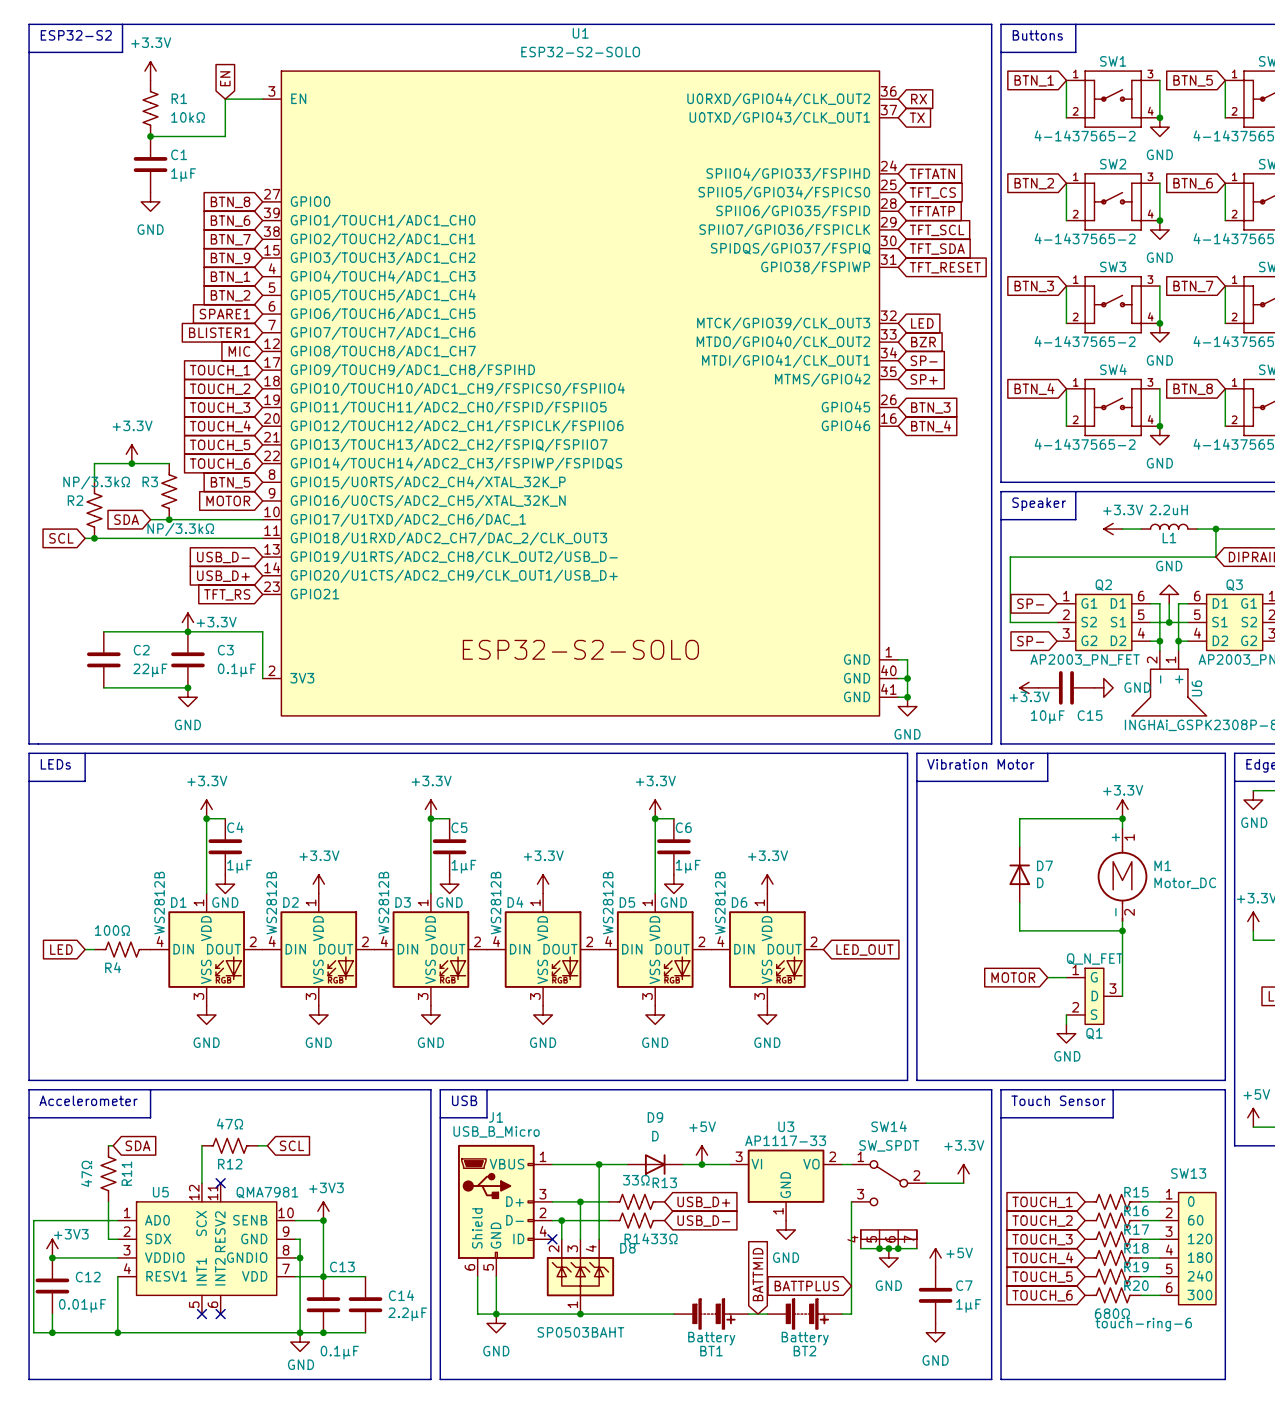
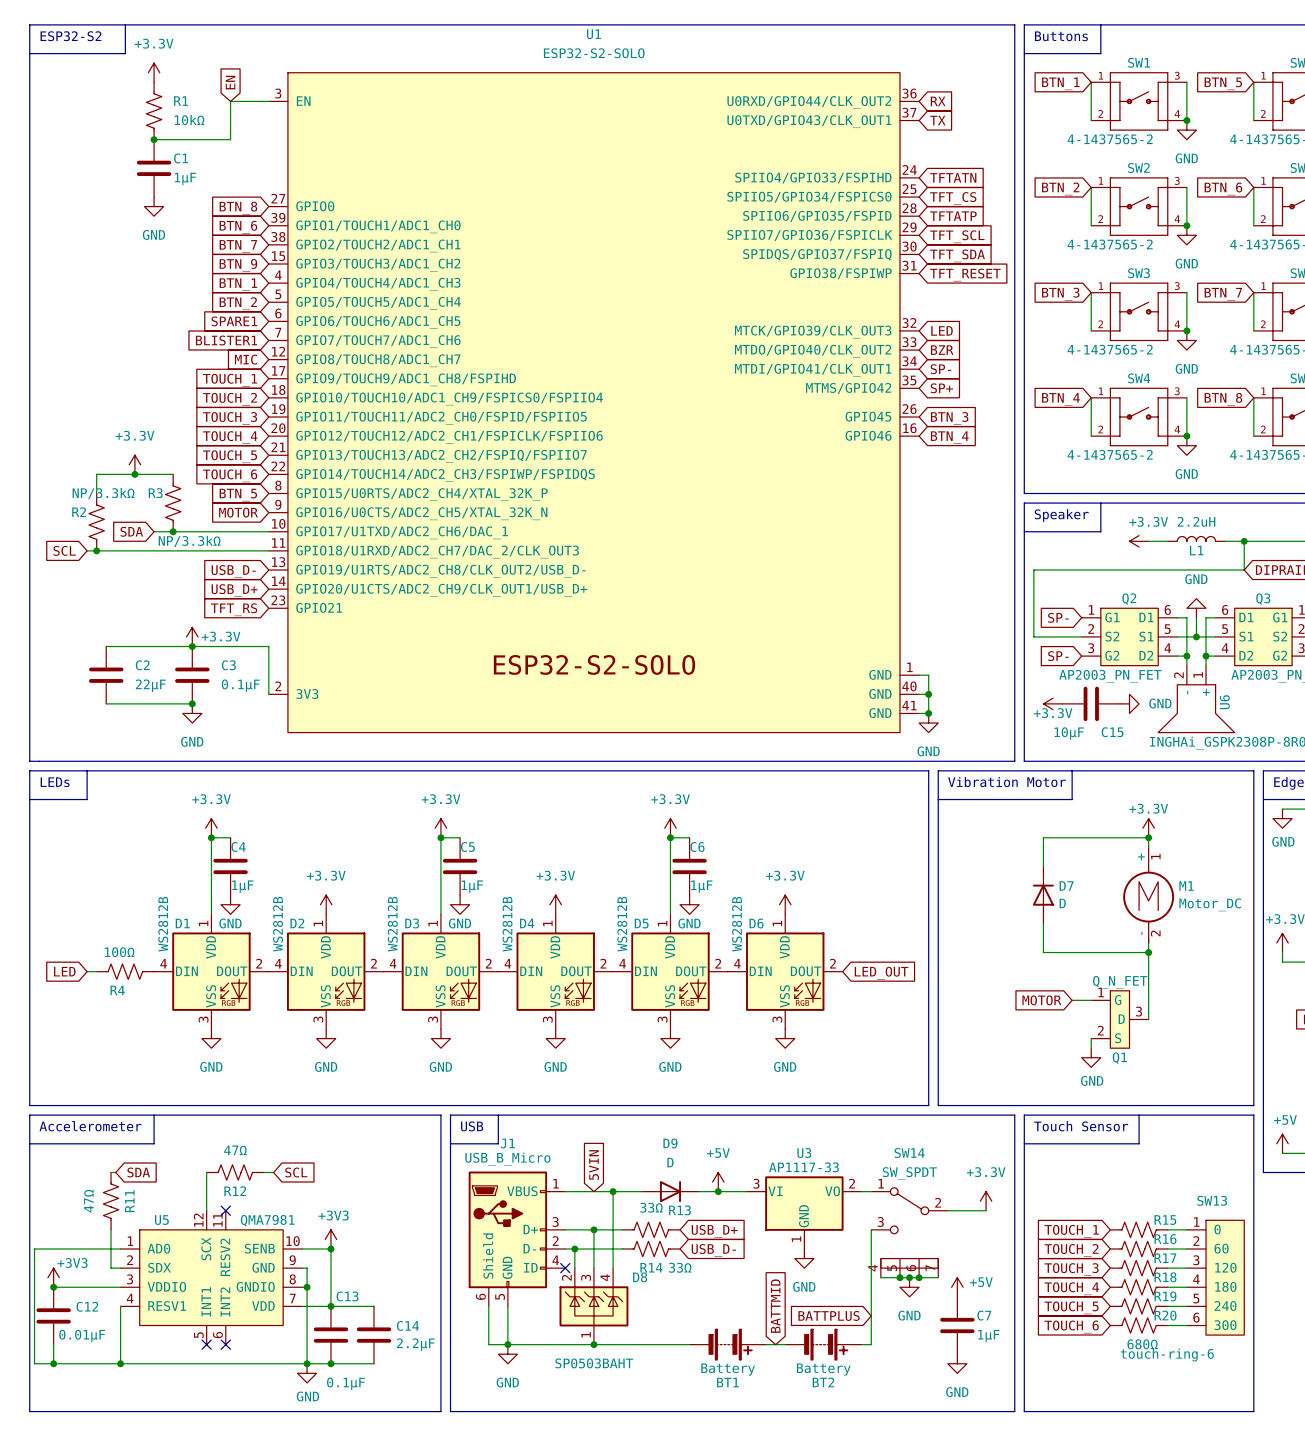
global label: none -> 5VIN (594, 1165)

